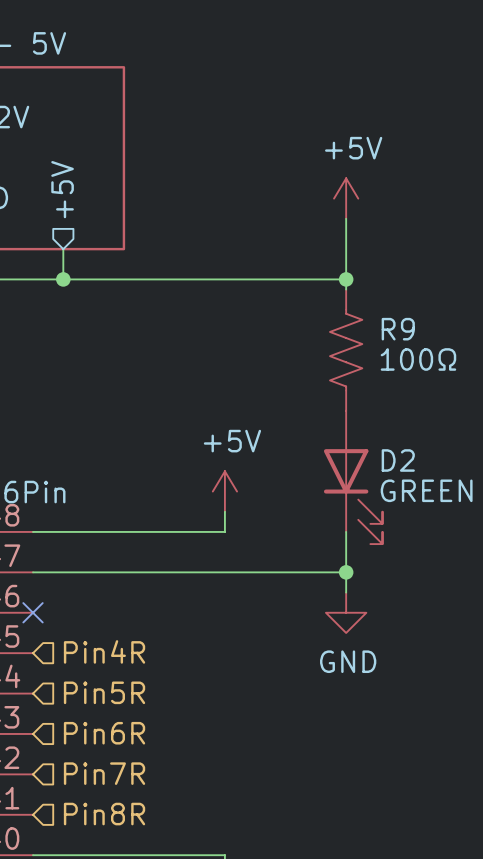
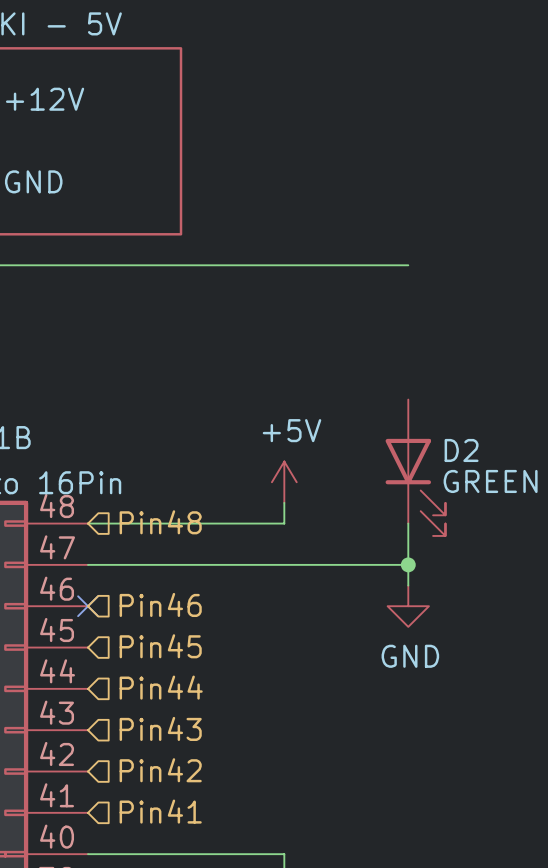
sheet pin: +5V (62, 189) -> none
power symbol: +5V (346, 198) -> none
wire: (346, 218) (346, 289) -> none
wire: (63, 249) (63, 279) -> none
junction: (63, 279) -> none
junction: (346, 279) -> none
R9: 100Ω (346, 350) -> none
hierarchical label: none -> Pin48 (160, 522)
hierarchical label: none -> Pin46 (160, 604)
hierarchical label: Pin4R (104, 651) -> Pin45 (160, 646)
hierarchical label: Pin5R (104, 692) -> Pin44 (161, 687)
hierarchical label: Pin6R (104, 733) -> Pin43 (160, 728)
hierarchical label: Pin7R (104, 773) -> Pin42 (160, 770)
hierarchical label: Pin8R (104, 814) -> Pin41 (160, 811)

